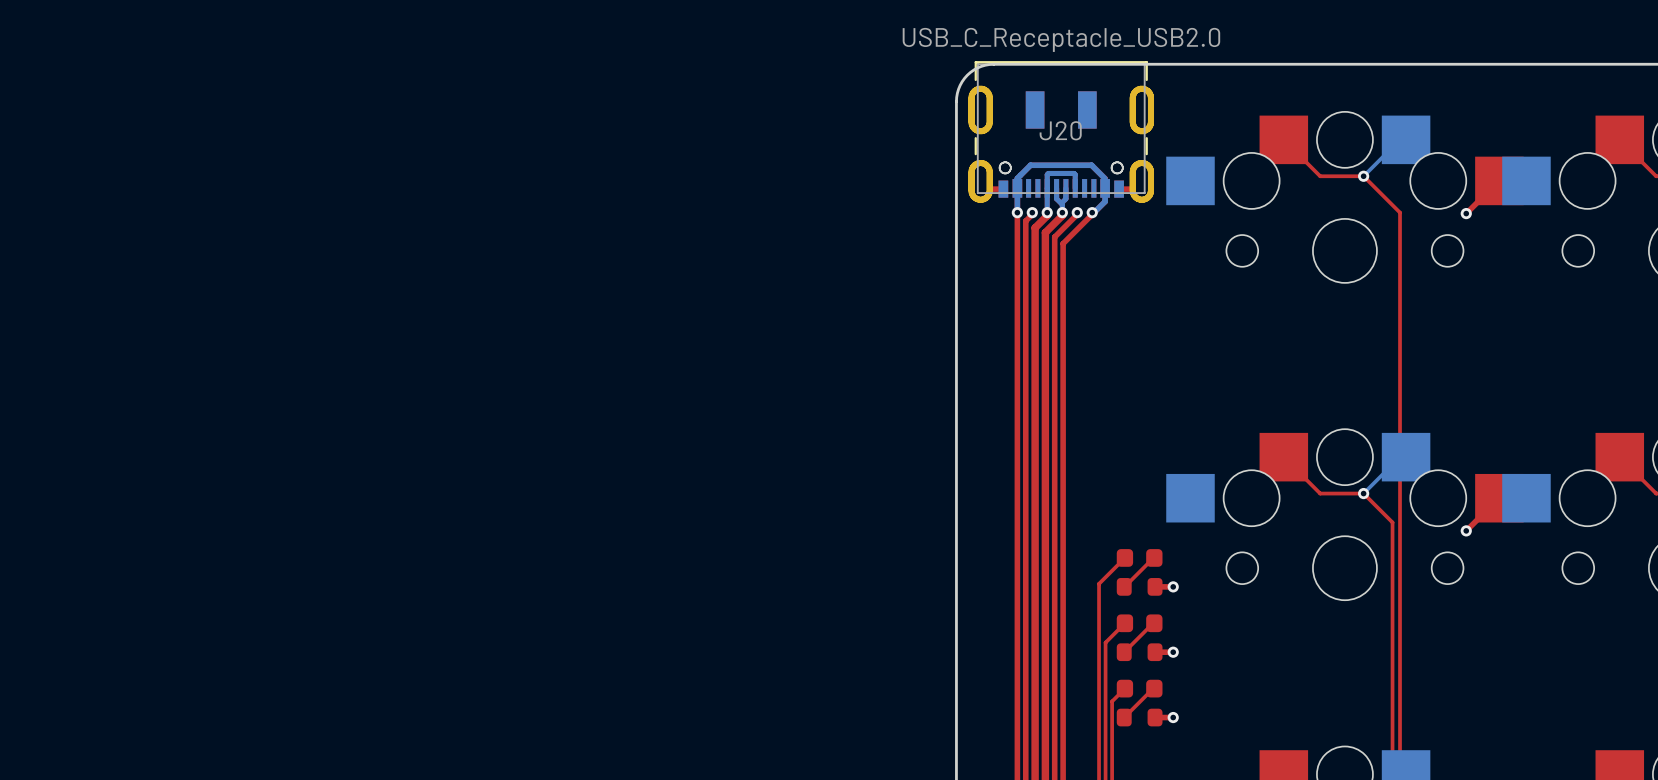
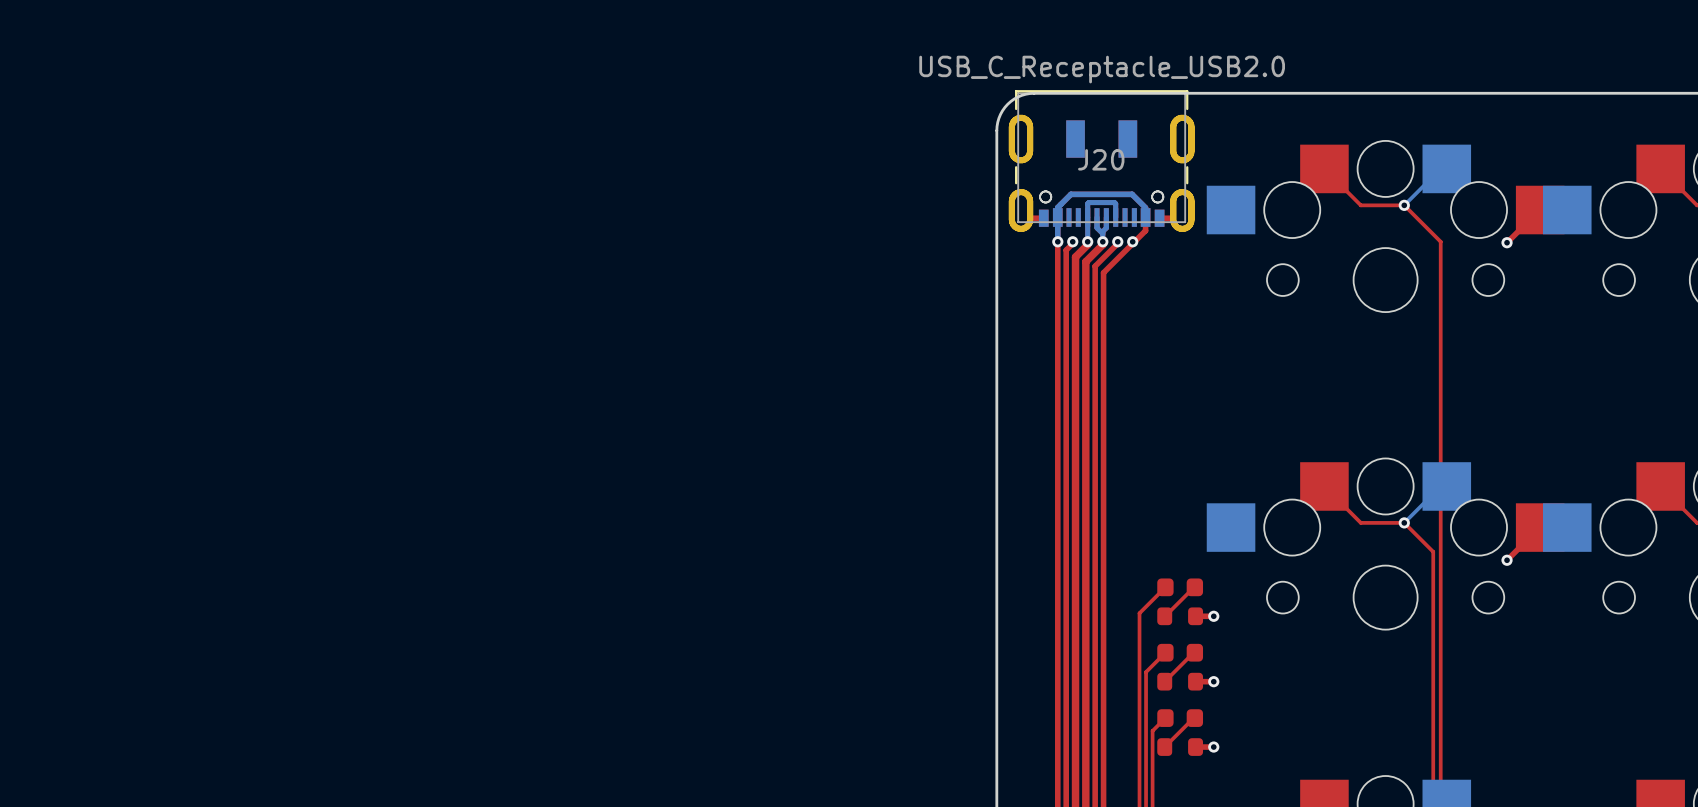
bottom track: (1105, 188) (1105, 201) (1092, 212) -> none

